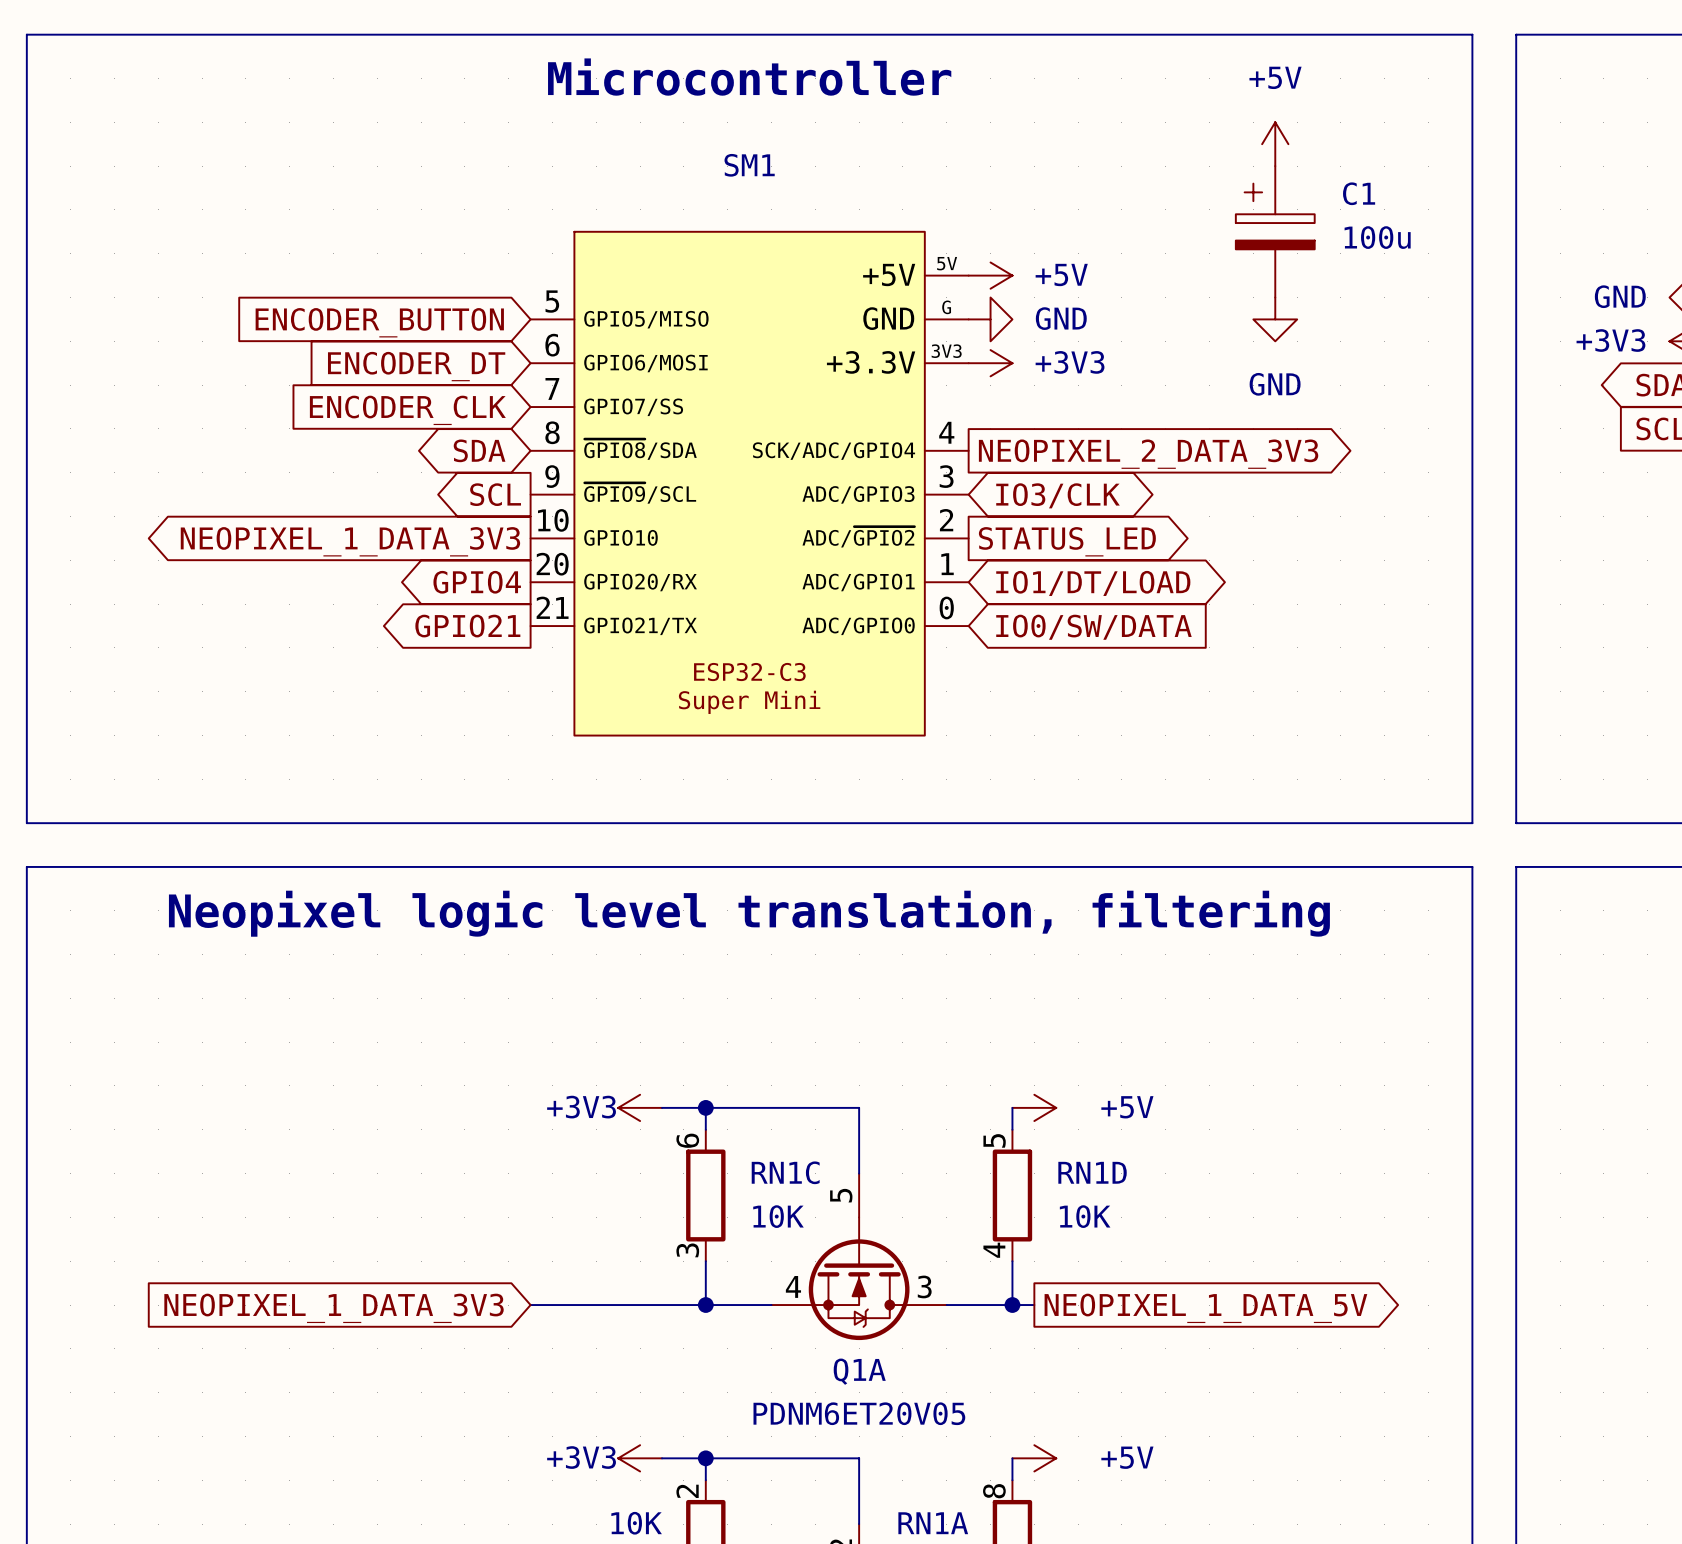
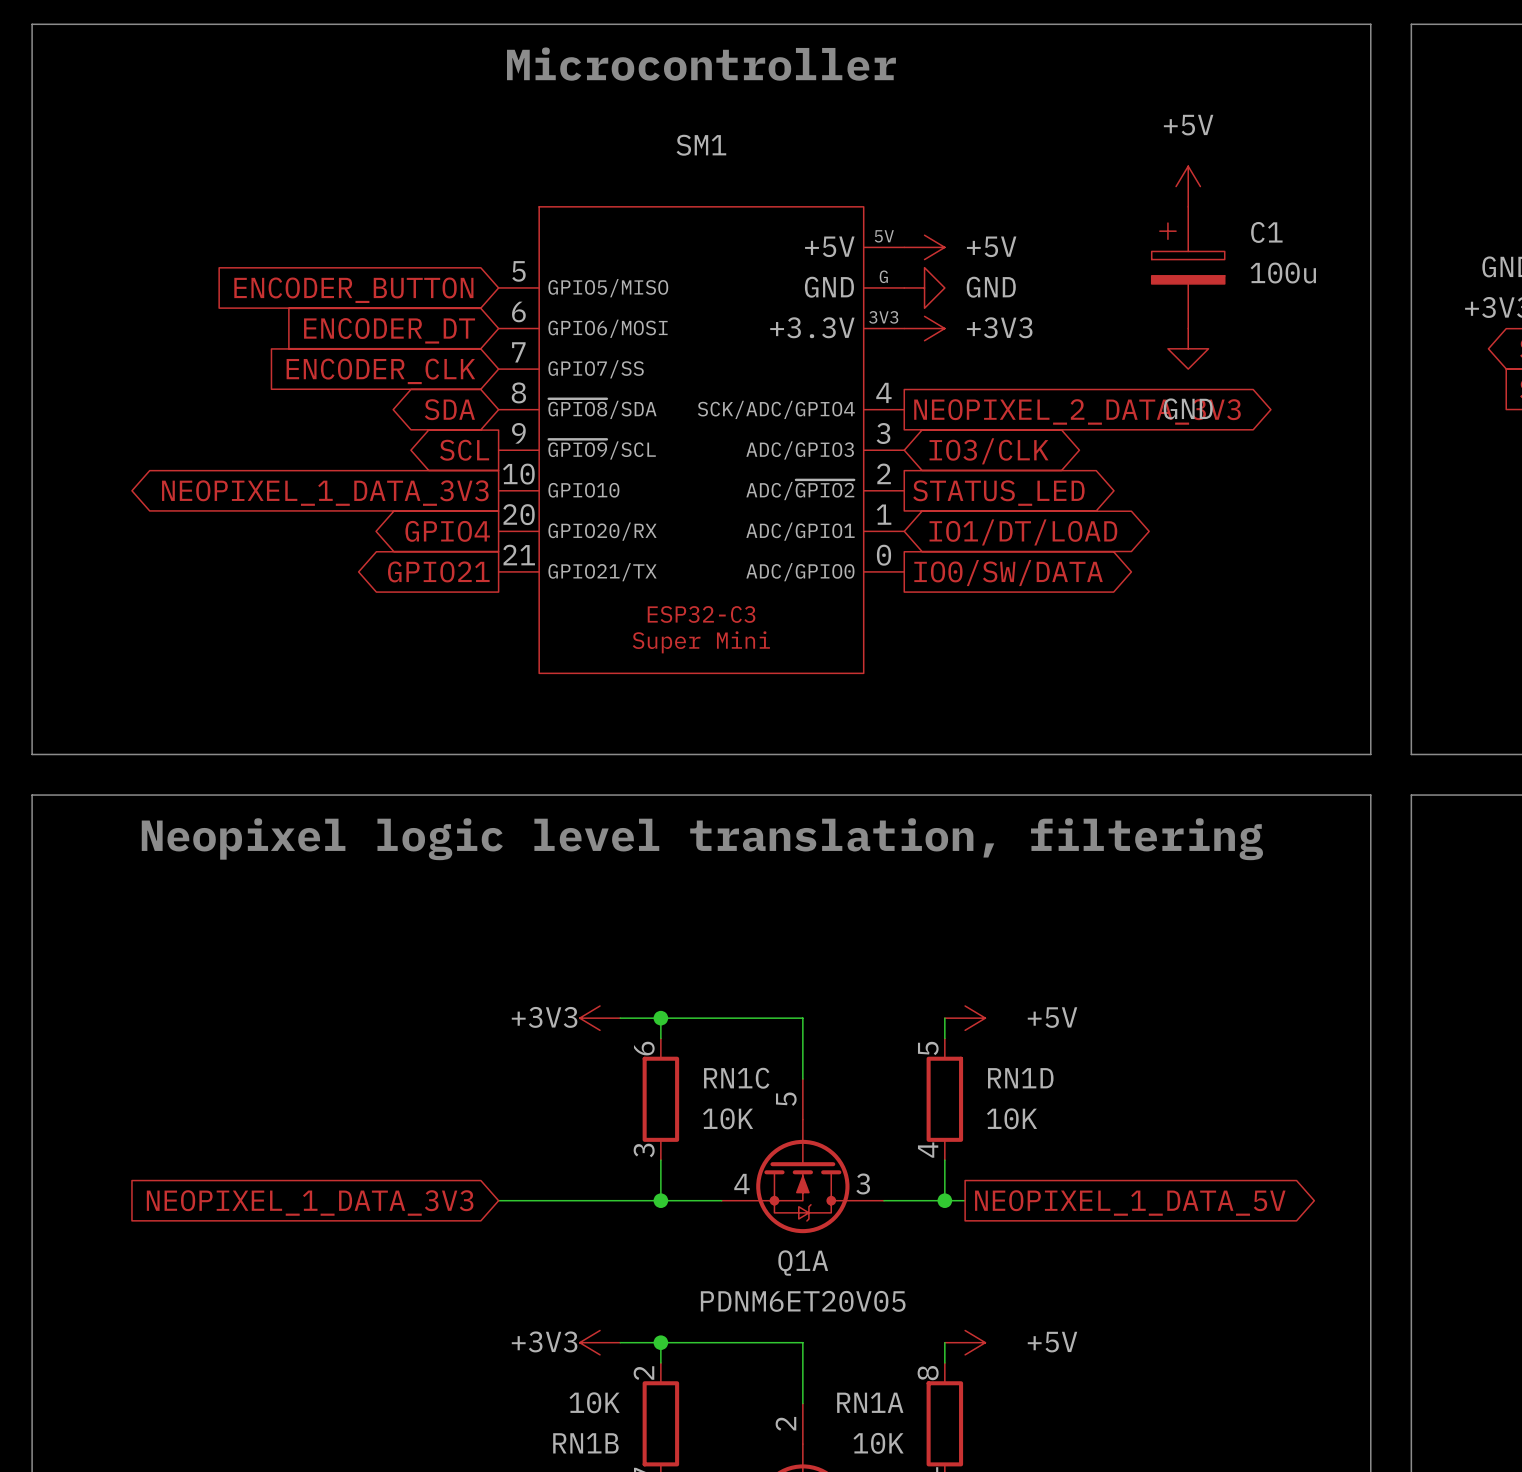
power symbol position: +5V (1275, 144) -> +5V (1188, 186)
C1 position: (1275, 231) -> (1188, 267)
power symbol position: GND (1275, 319) -> GND (1188, 348)
global label shape: input (1093, 627) -> output (1008, 573)

